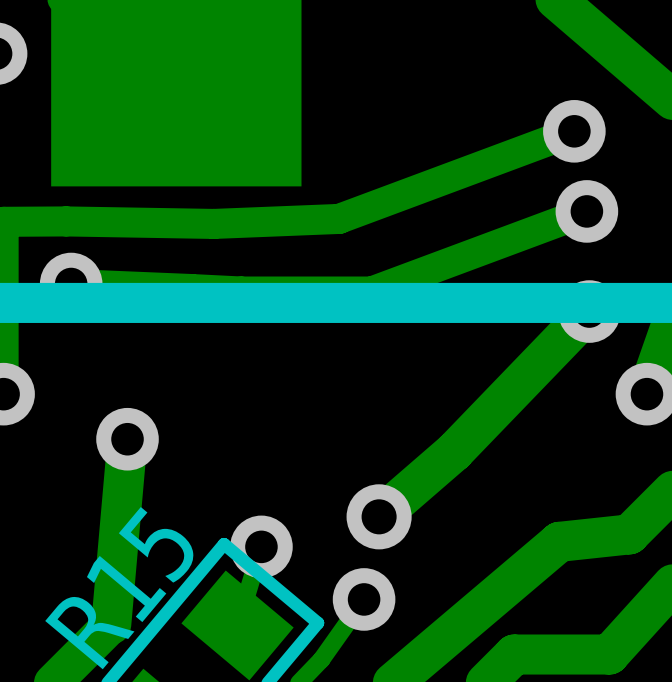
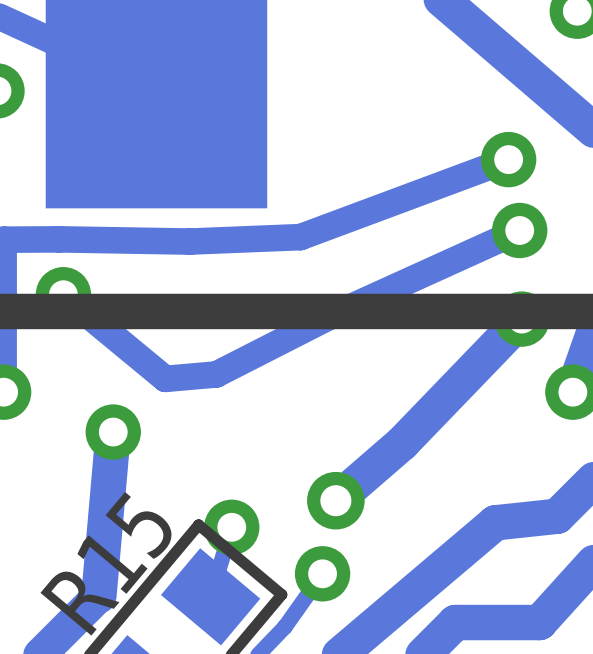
track: (586, 211) (371, 291) (241, 291) (71, 284) -> (519, 230) (329, 316) (216, 374) (165, 378) (63, 294)

